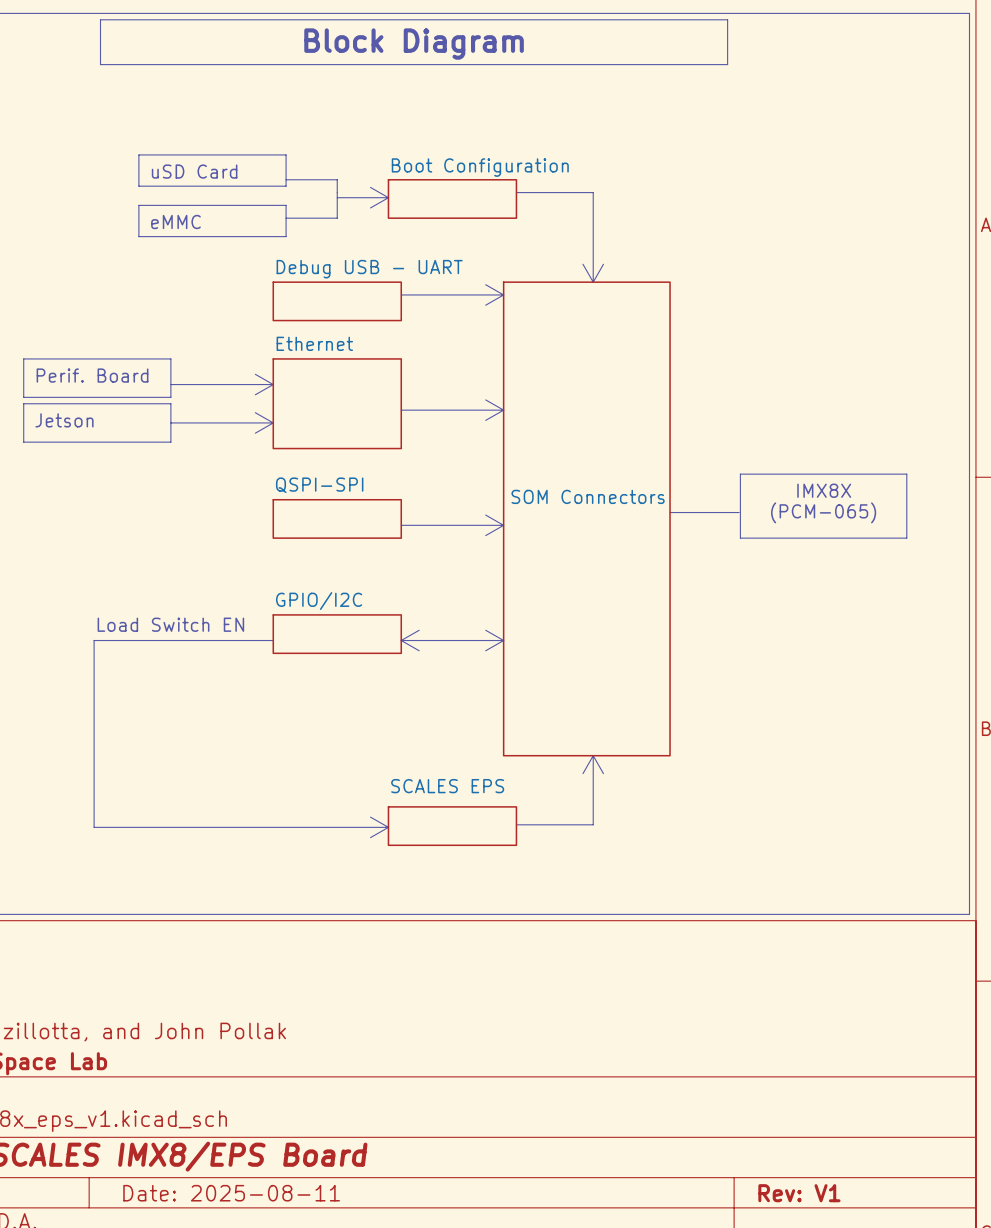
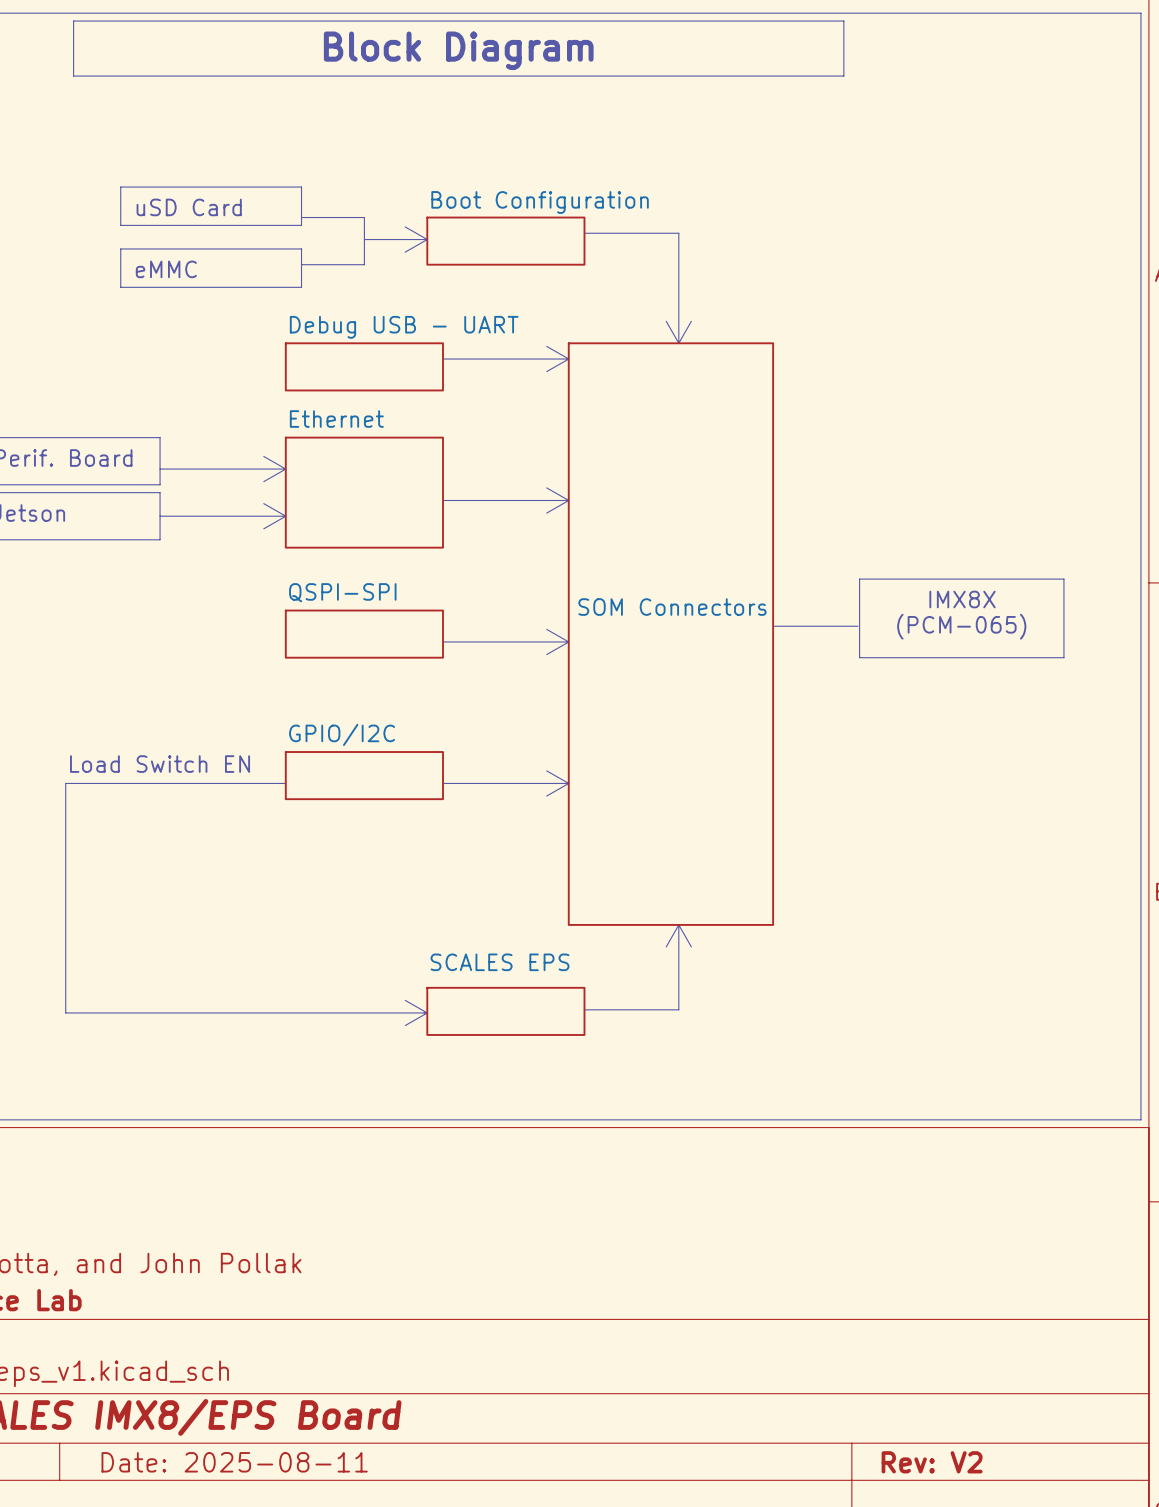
line: (419, 630) (401, 640) (419, 650) -> none
title block: Rev: V1 (799, 1193) -> Rev: V2 (932, 1462)

